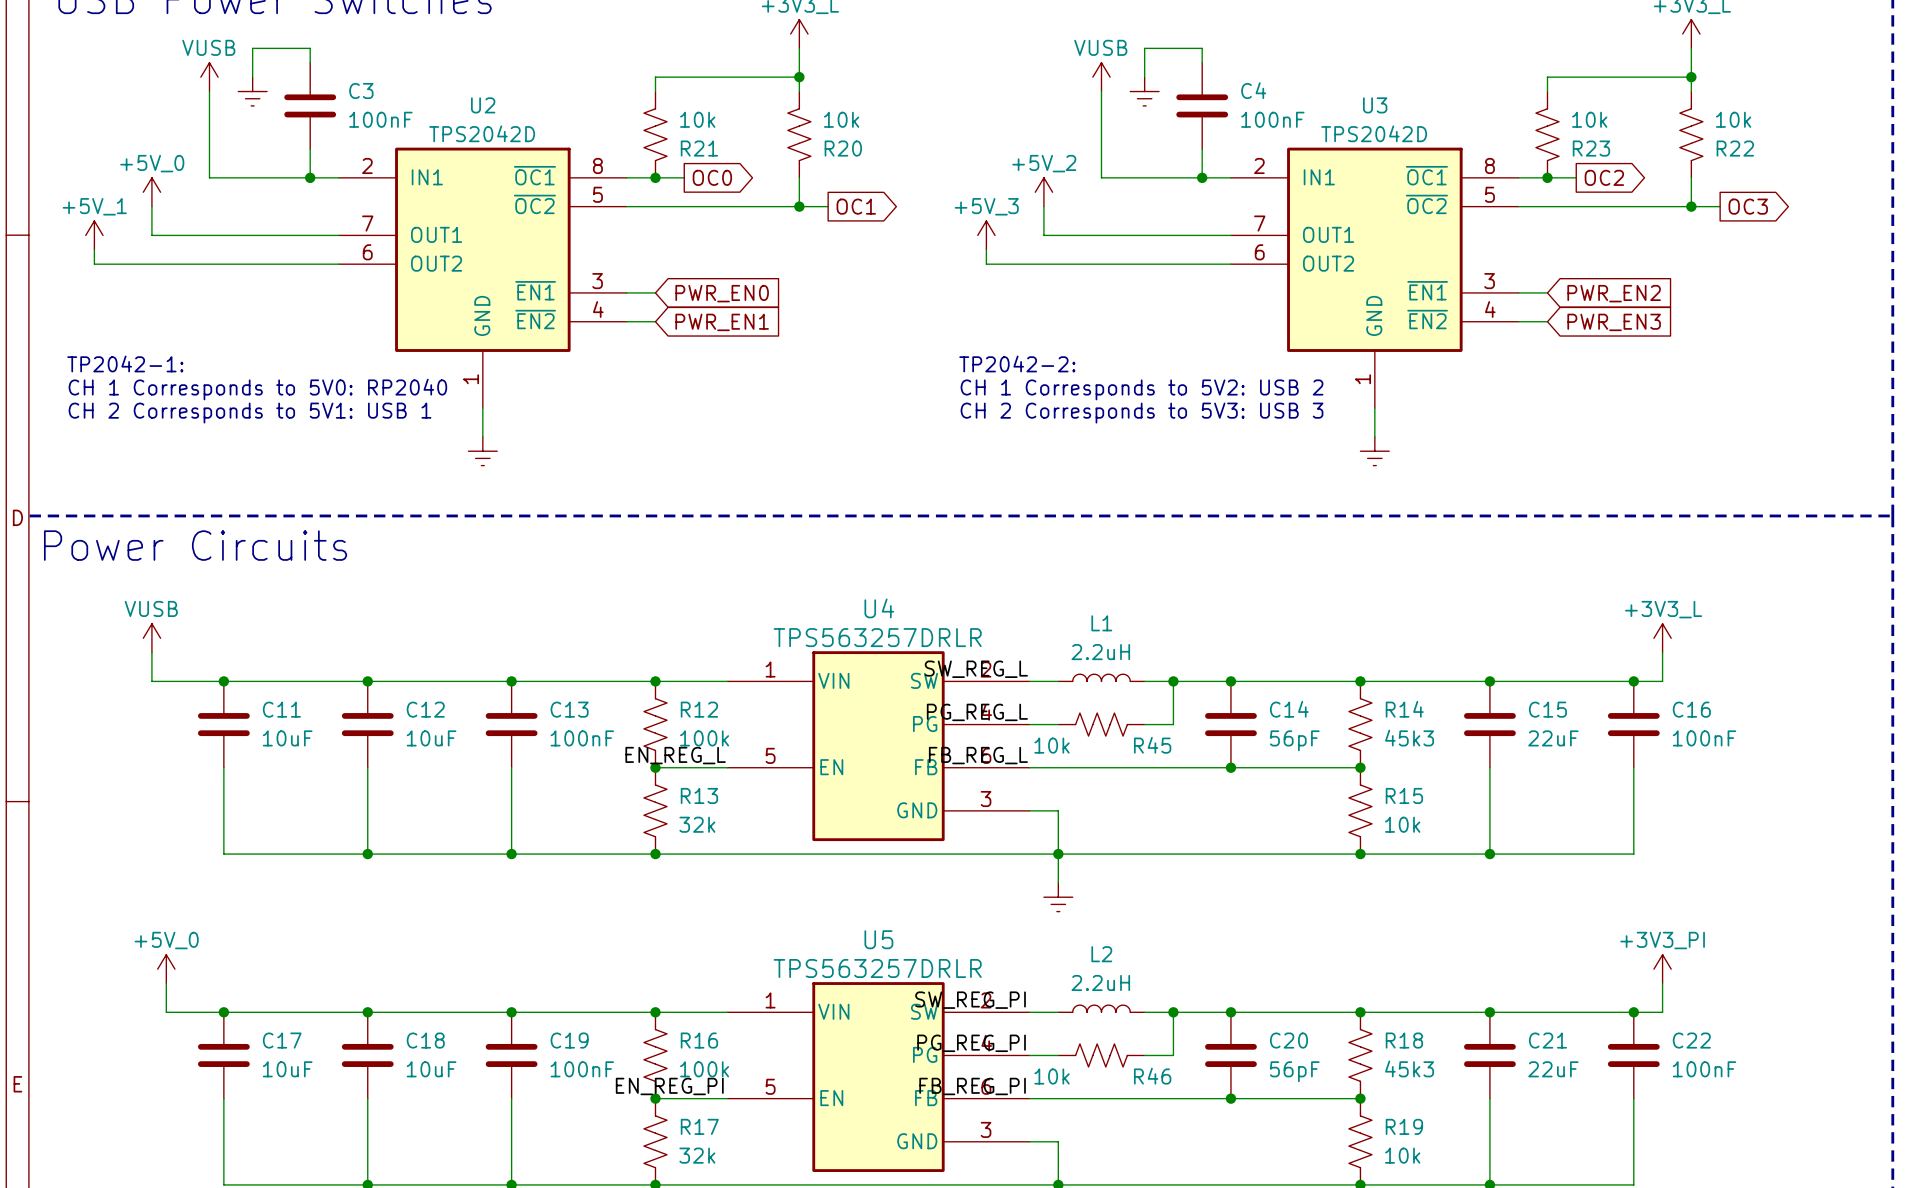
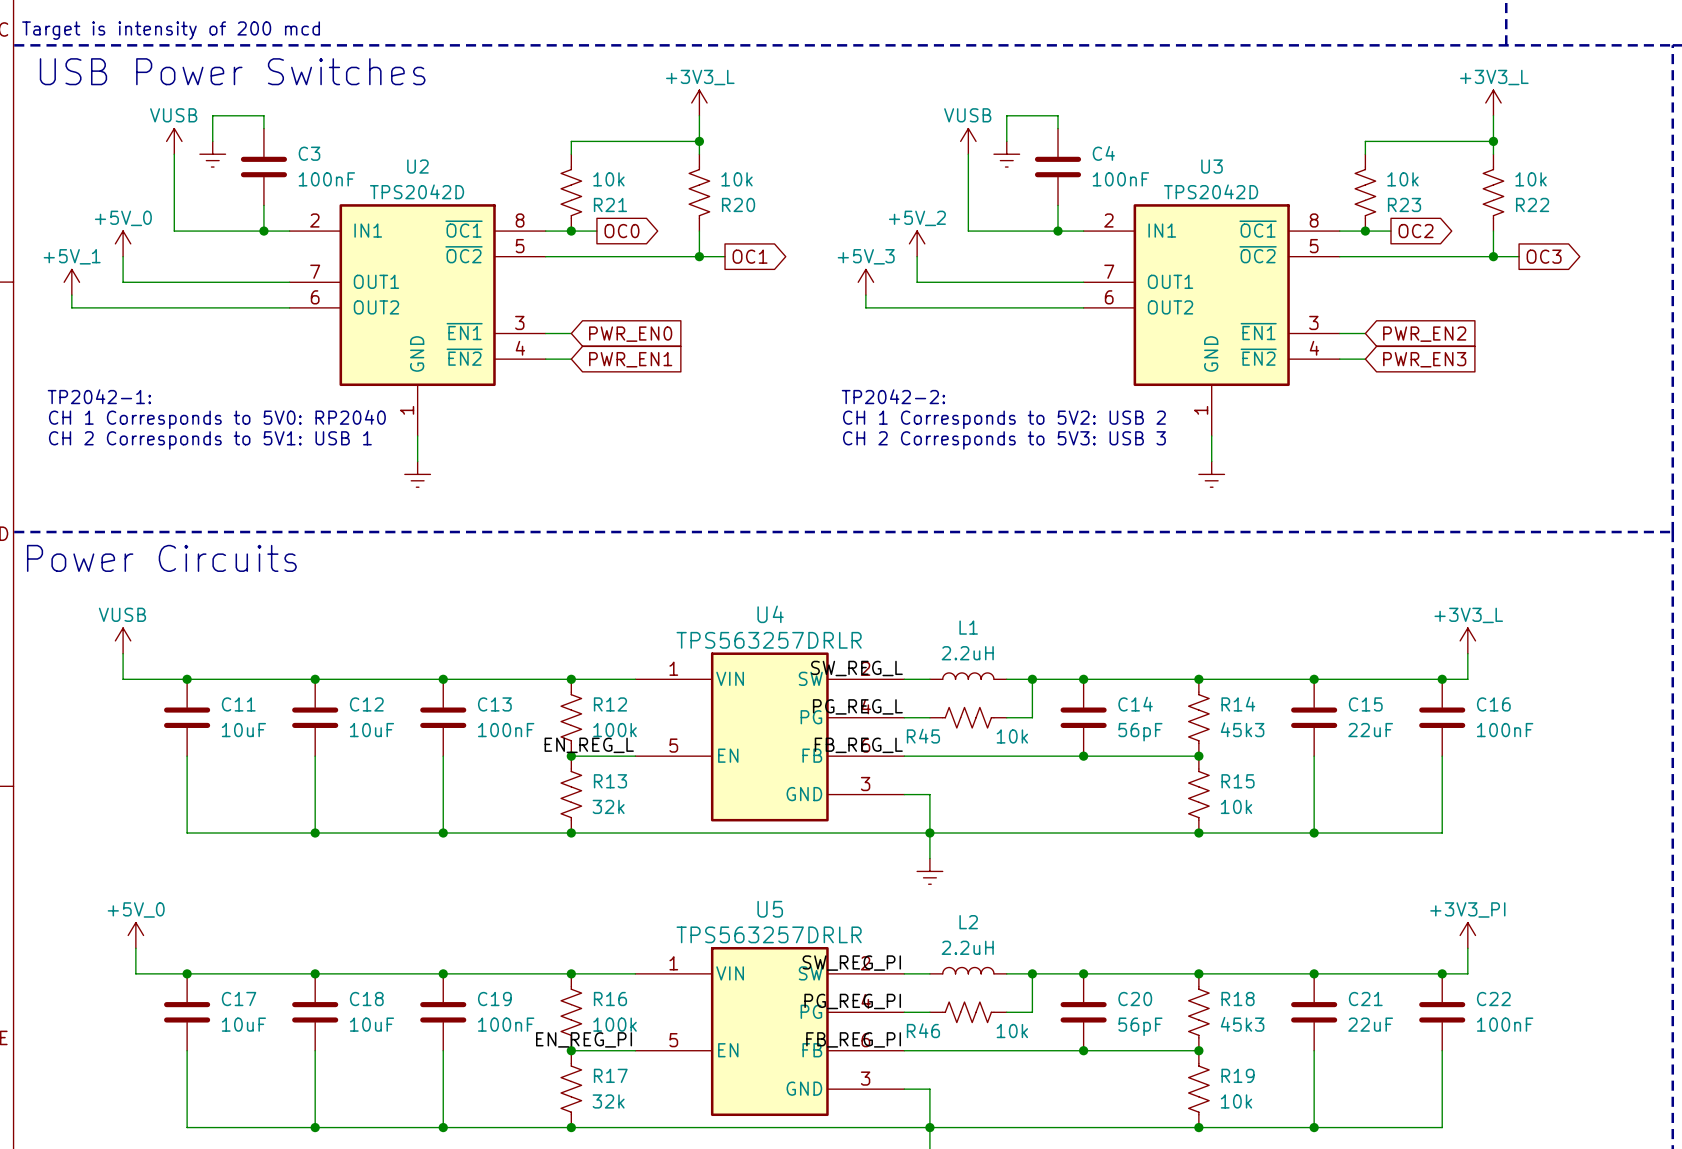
R45 value position: 10k (1052, 745) -> 10k (1012, 736)
R45 name position: R45 (1152, 745) -> R45 (923, 736)
R46 value position: 10k (1052, 1076) -> 10k (1012, 1031)
R46 name position: R46 (1152, 1076) -> R46 (923, 1030)

